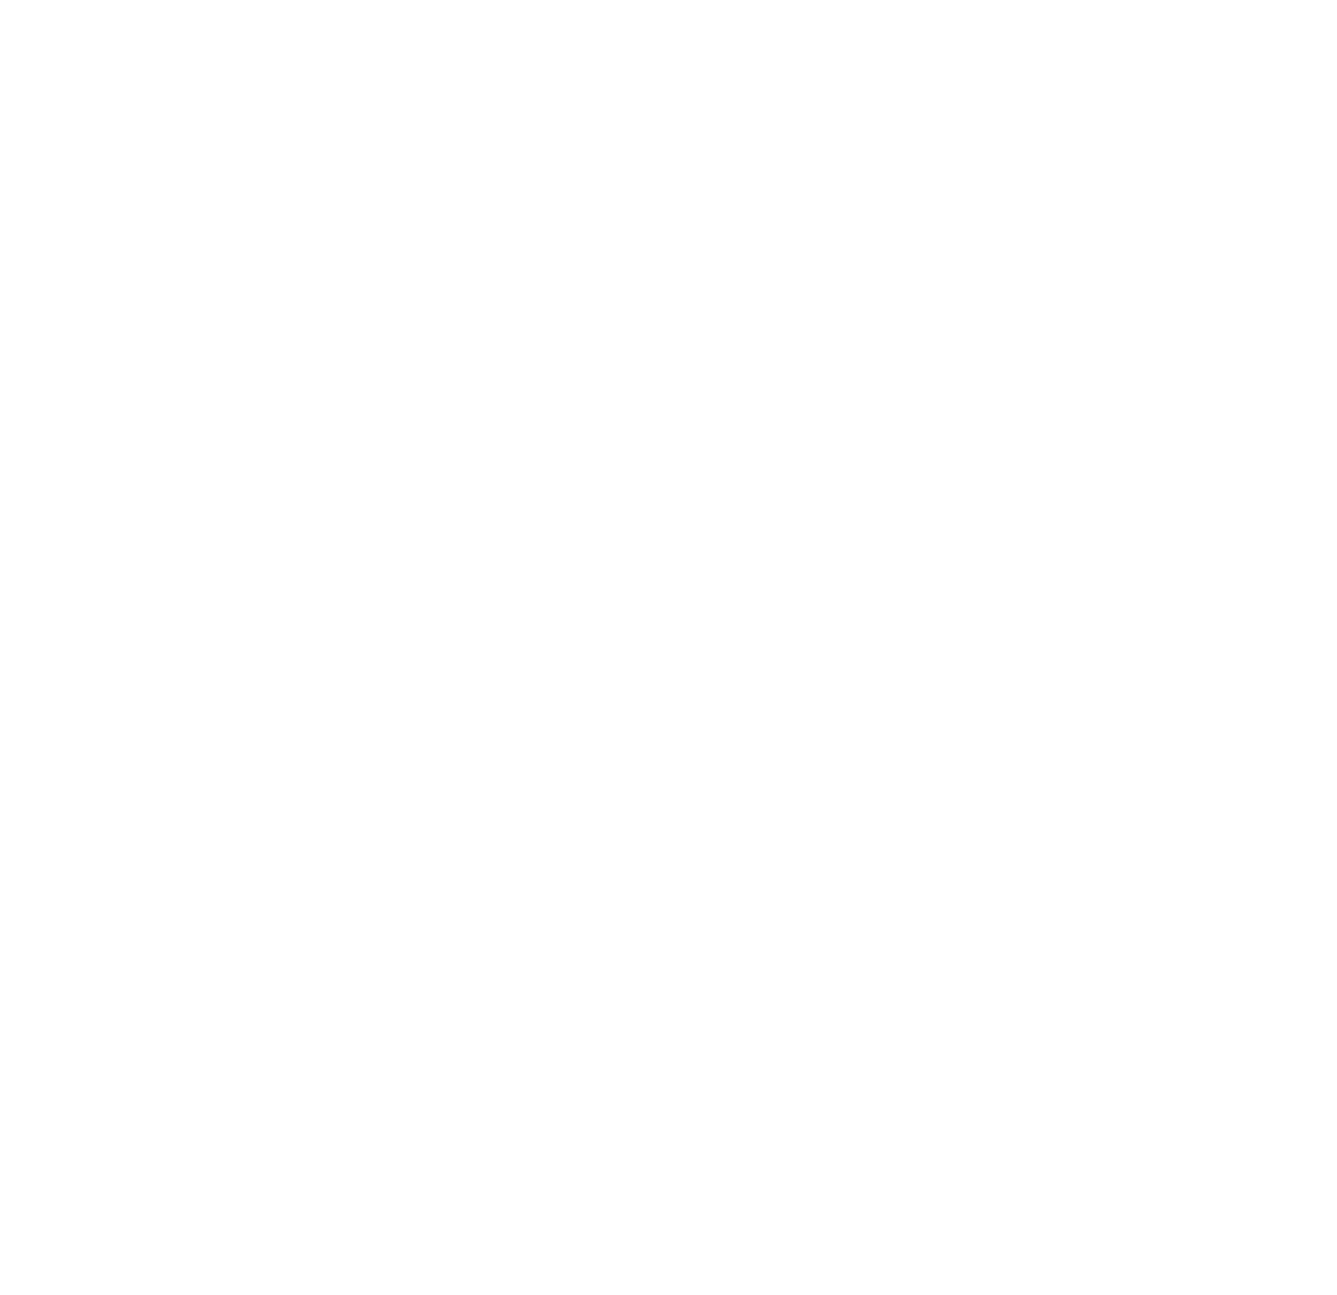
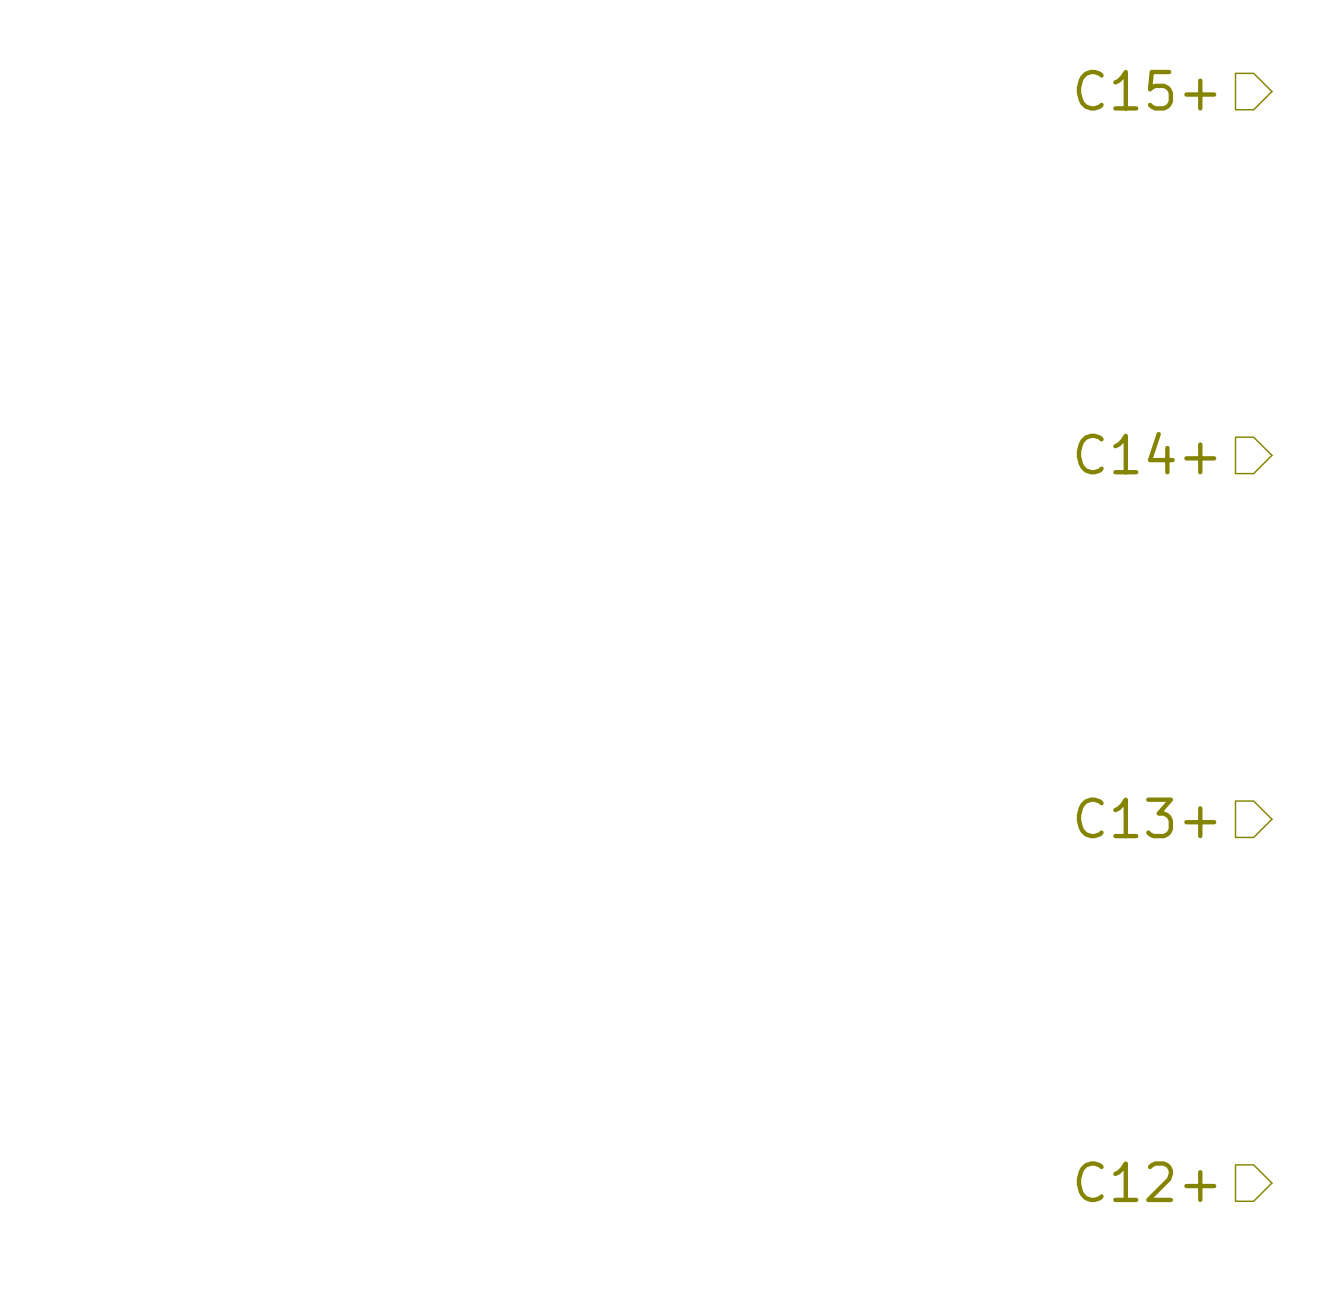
hierarchical label: none -> C15+ (1146, 90)
hierarchical label: none -> C14+ (1146, 453)
hierarchical label: none -> C13+ (1146, 817)
hierarchical label: none -> C12+ (1146, 1181)

